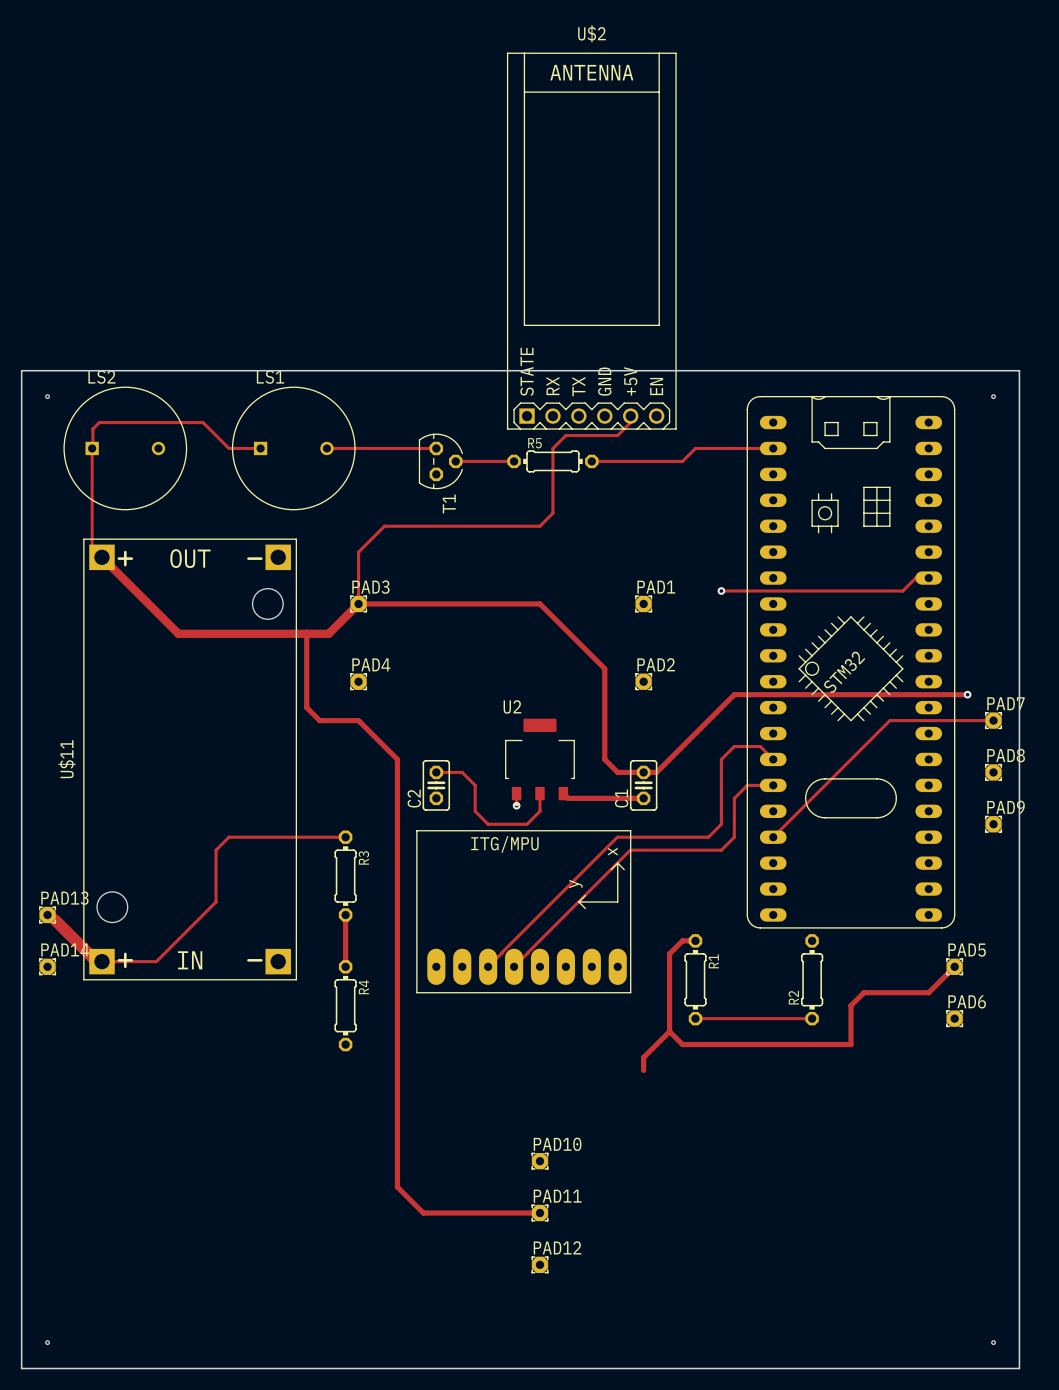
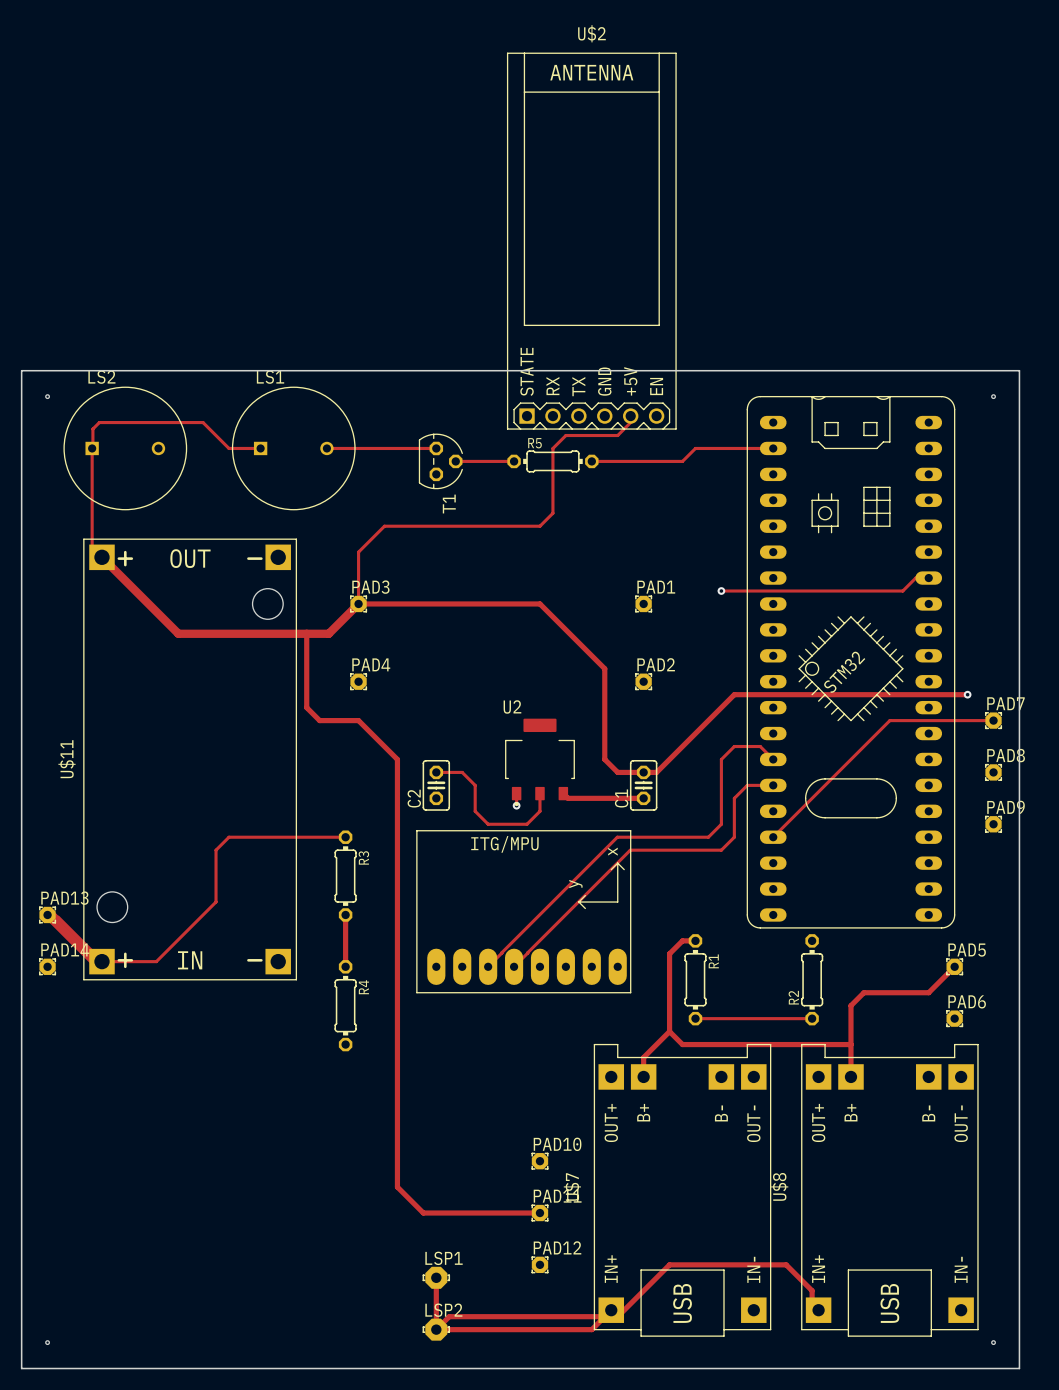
track: none -> (850, 1044) (850, 1076)
U$7: none -> (682, 1190)
U$8: none -> (889, 1190)
track: none -> (436, 1277) (436, 1329)
LSP1: none -> (436, 1277)
track: none -> (611, 1310) (591, 1329) (436, 1329)
track: none -> (818, 1310) (812, 1303) (812, 1290) (786, 1264) (669, 1264) (617, 1316) (449, 1316) (436, 1329)
LSP2: none -> (436, 1329)

